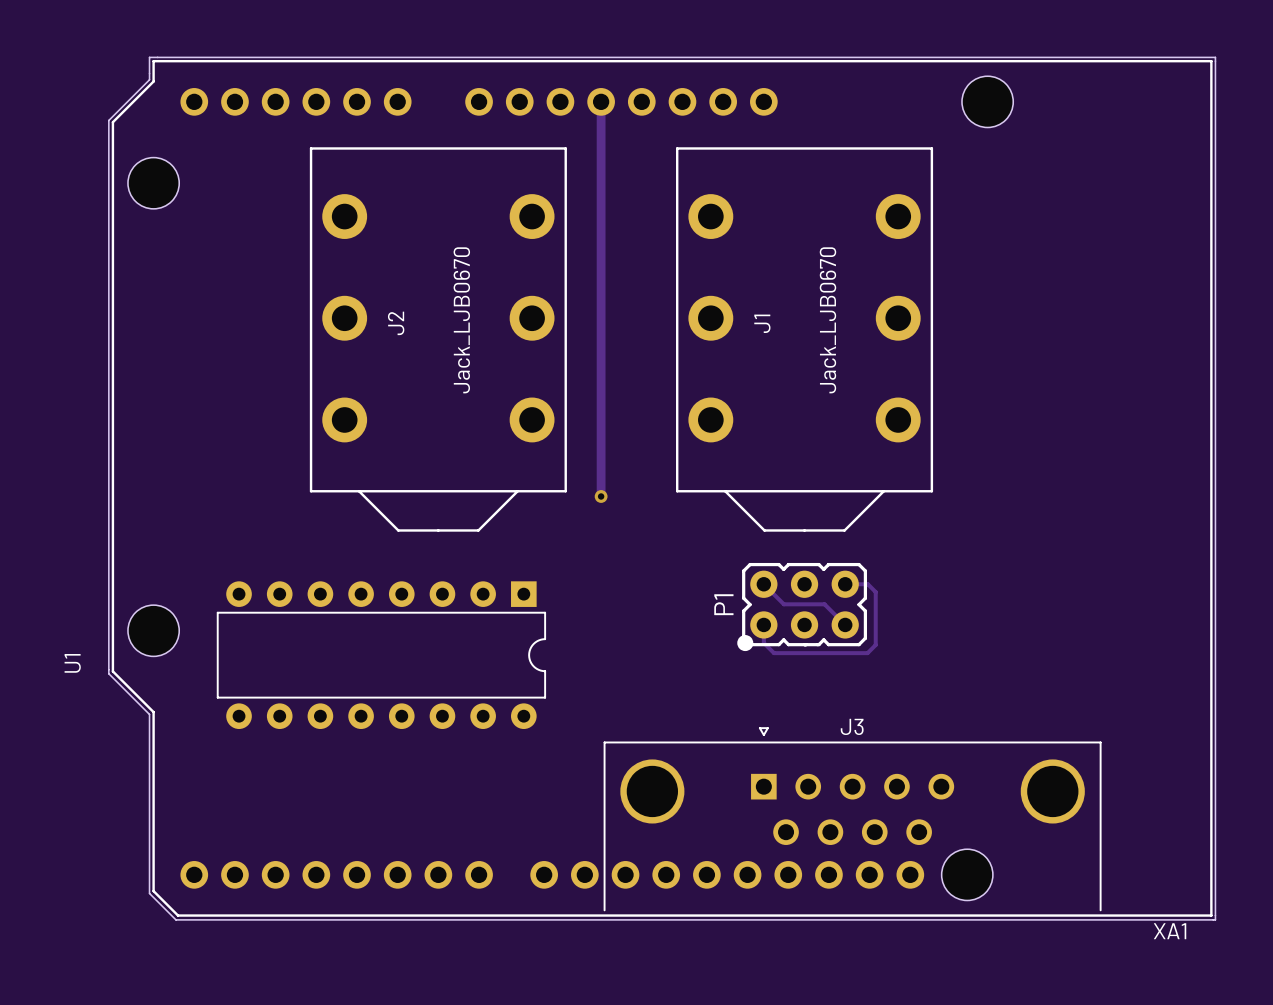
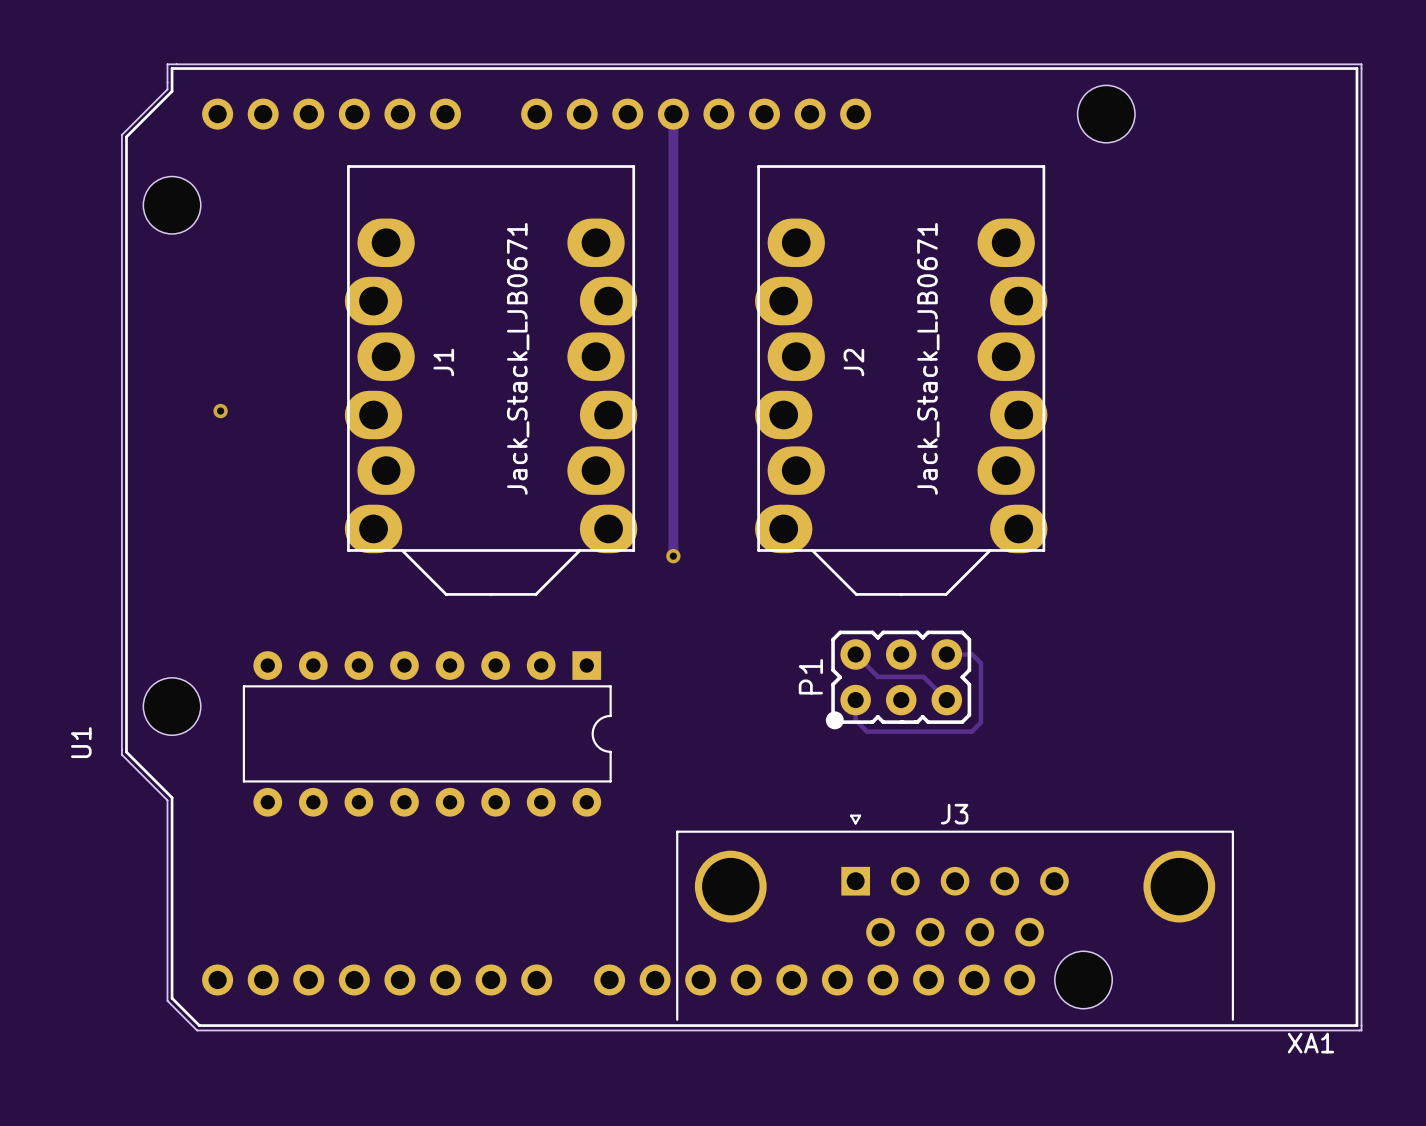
J2 footprint: [309, 147, 567, 532] -> [755, 165, 1048, 596]
J1 footprint: [676, 147, 934, 532] -> [344, 165, 638, 596]
J2 value: Jack_LJB0670 (461, 320) -> Jack_Stack_LJB0671 (928, 358)
J1 value: Jack_LJB0670 (827, 320) -> Jack_Stack_LJB0671 (518, 358)
via: none -> (220, 411)

